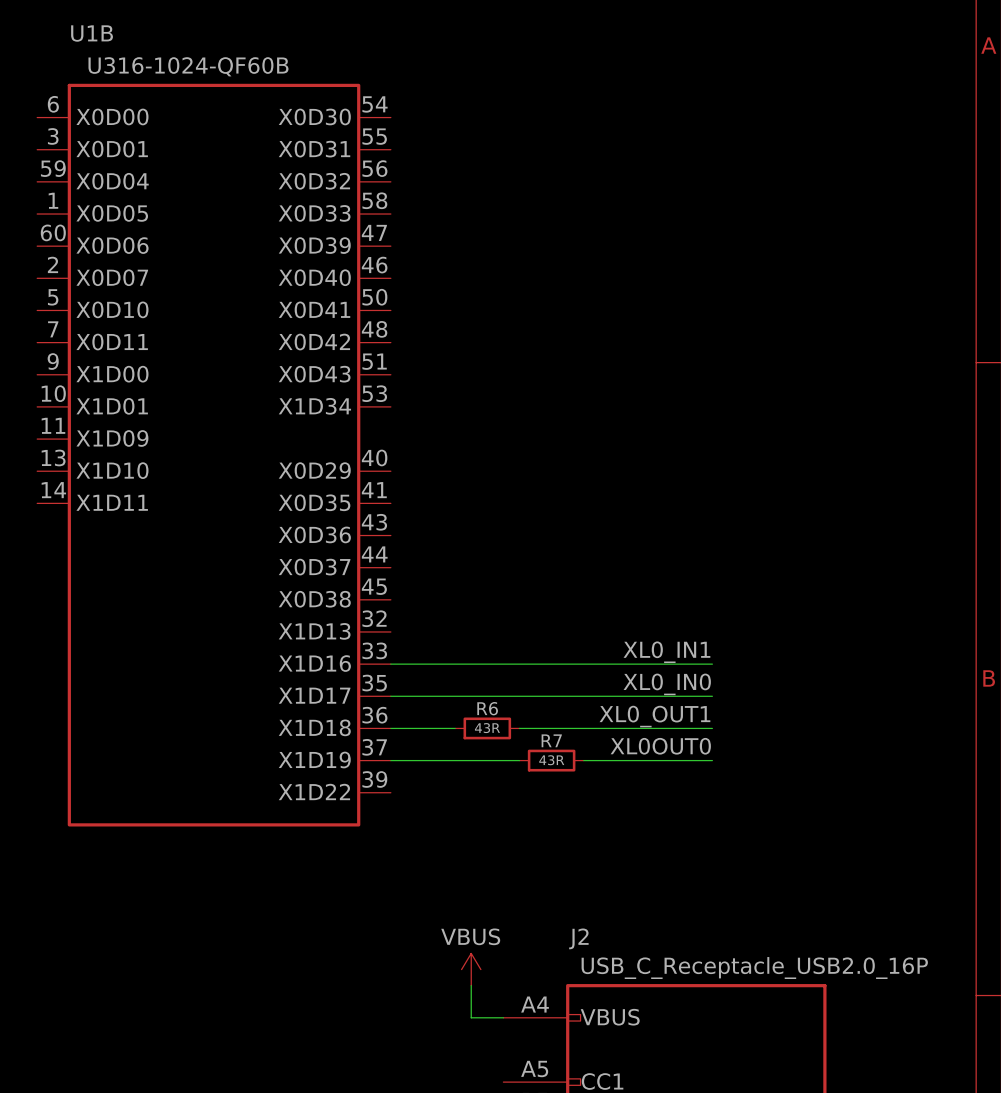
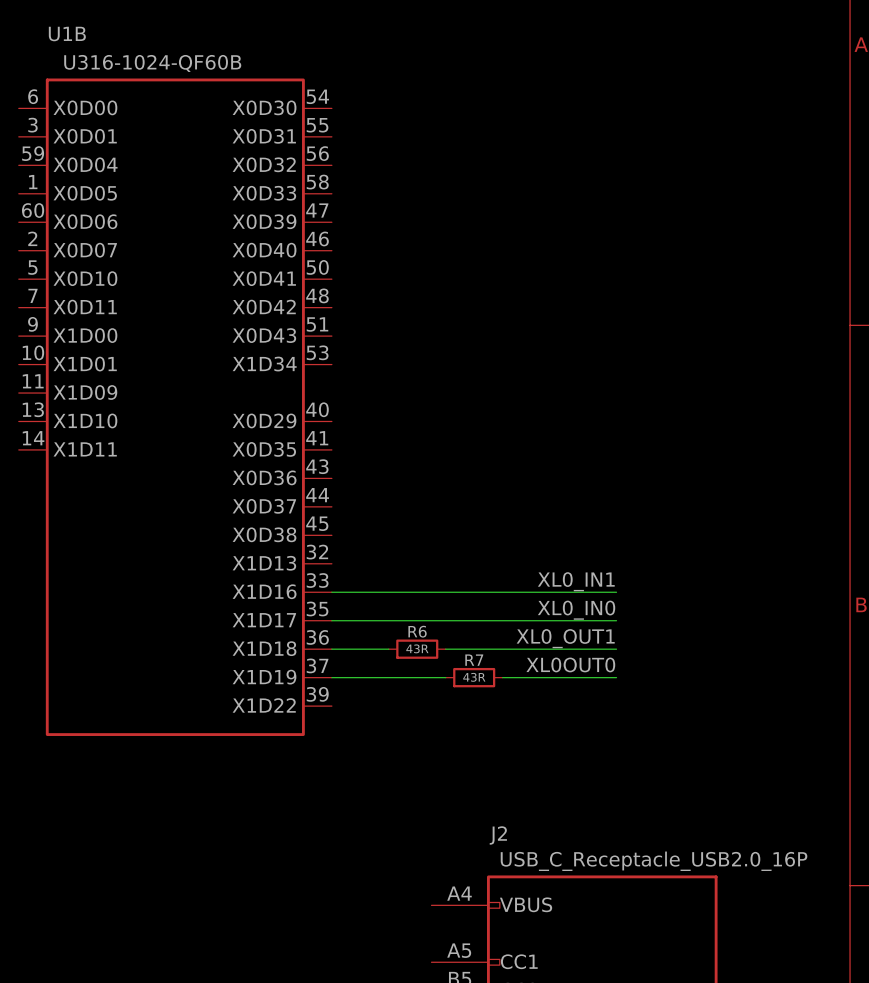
power symbol: VBUS (471, 969) -> none
wire: (471, 985) (471, 1017) (503, 1017) -> none

